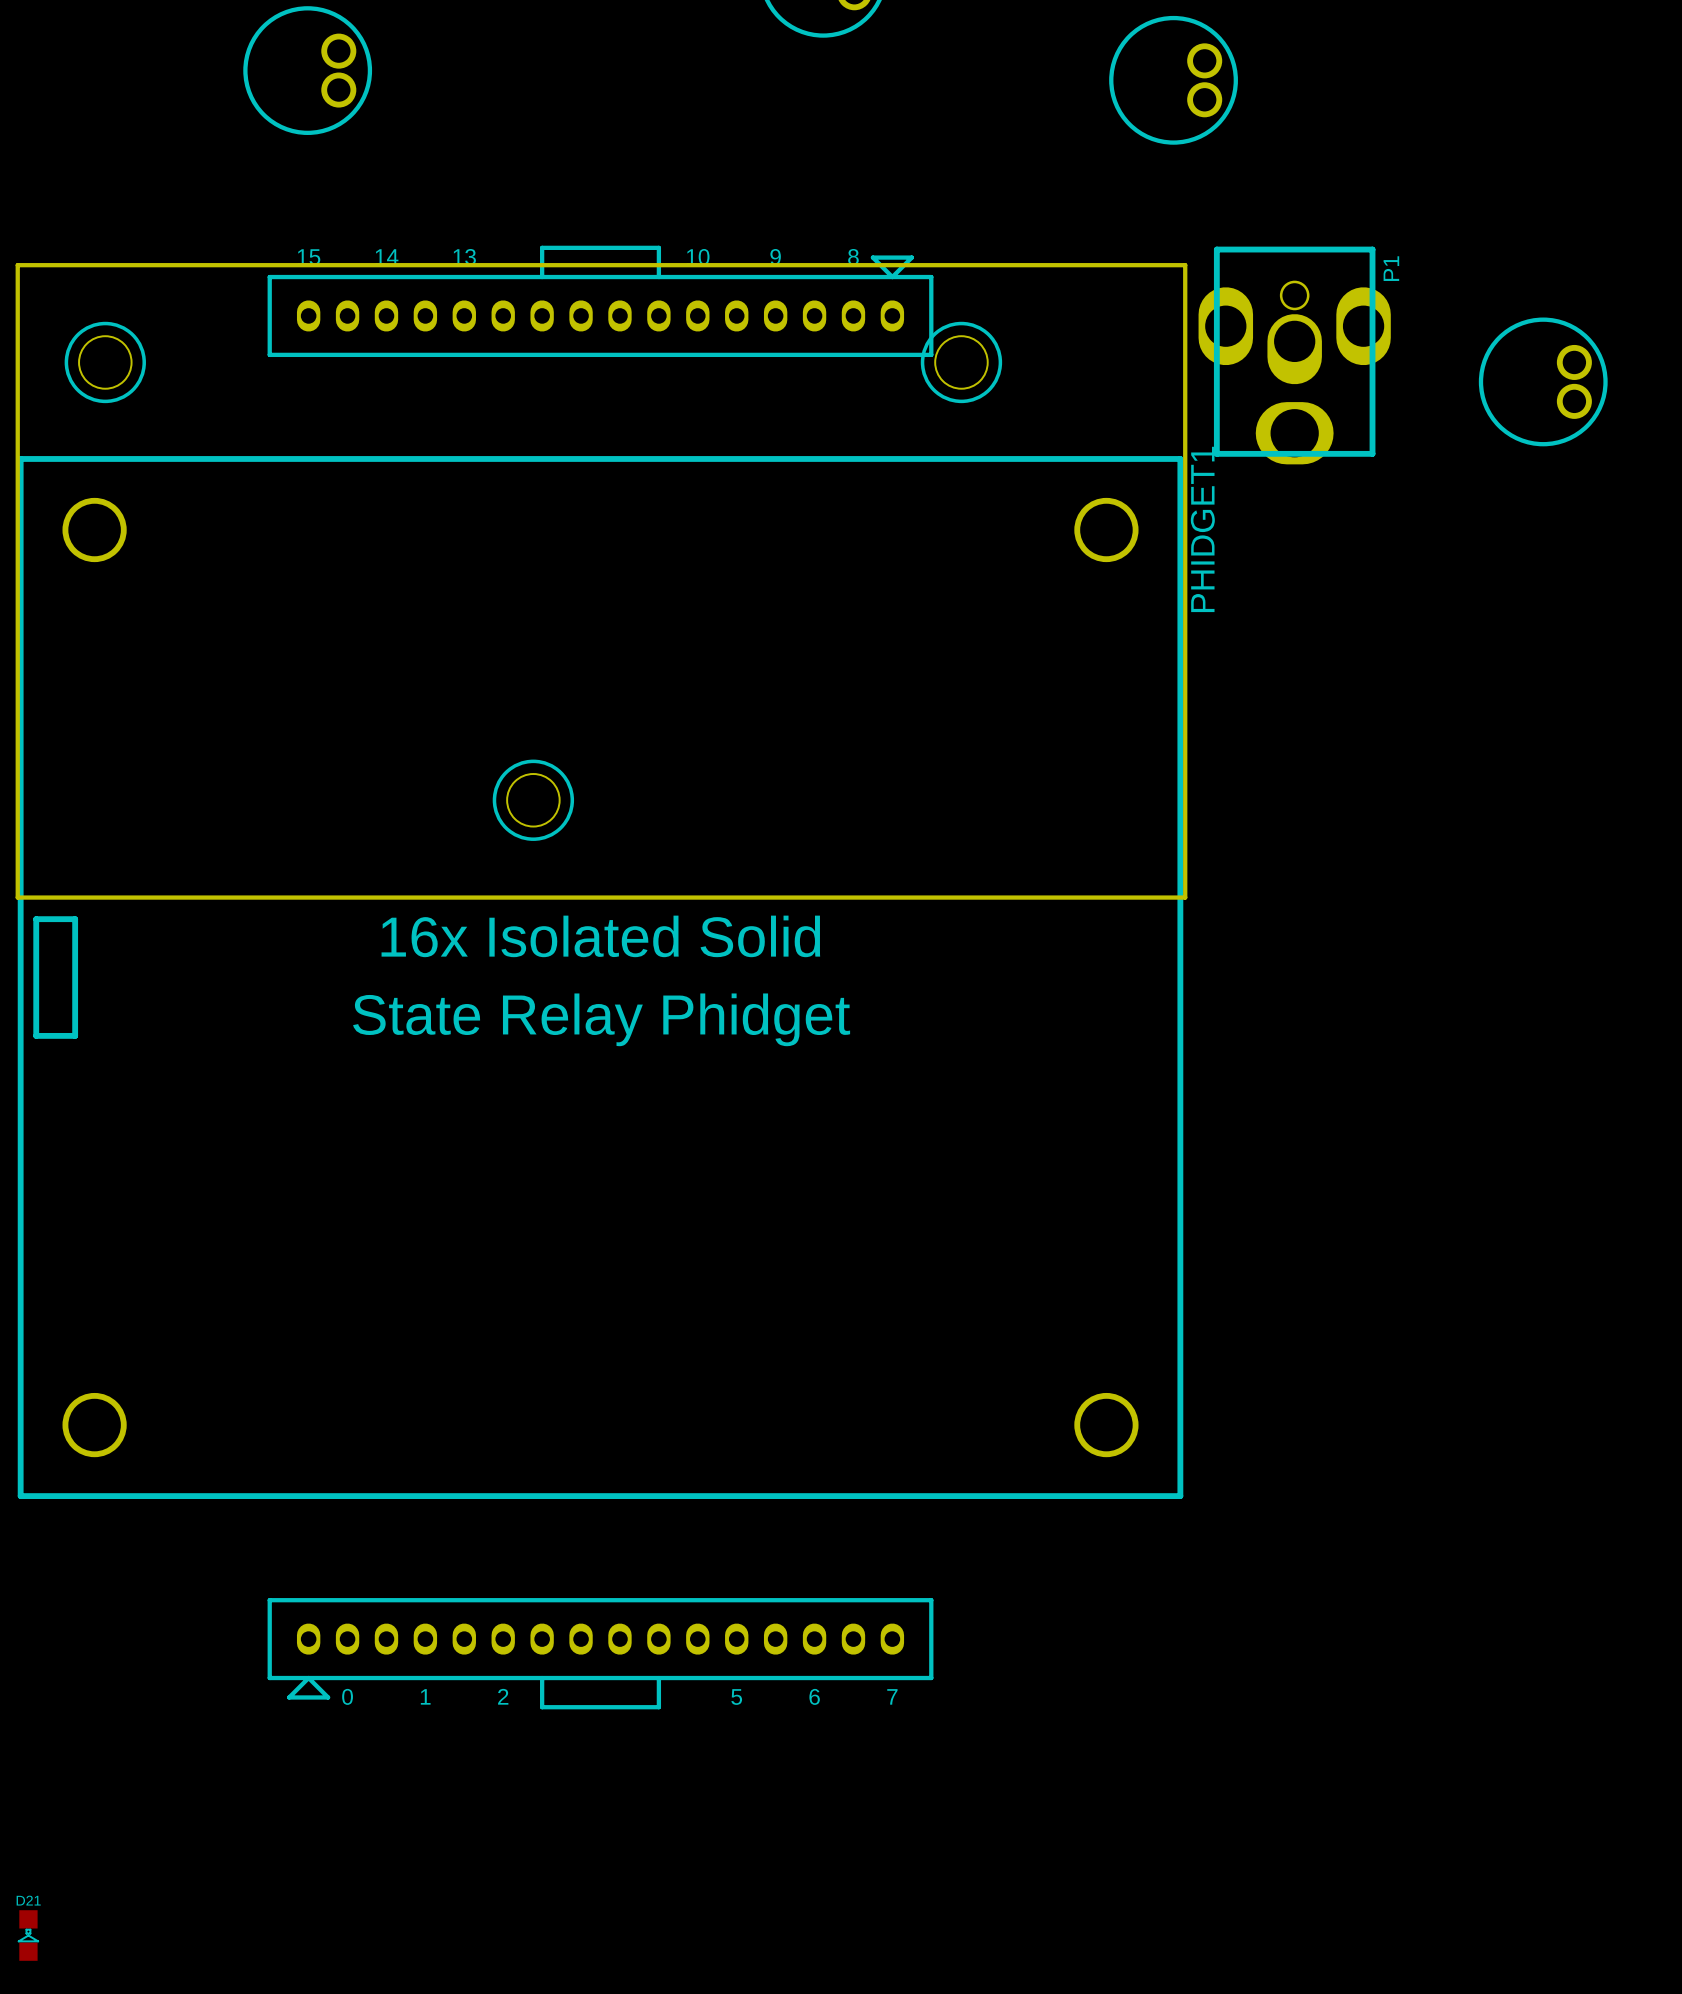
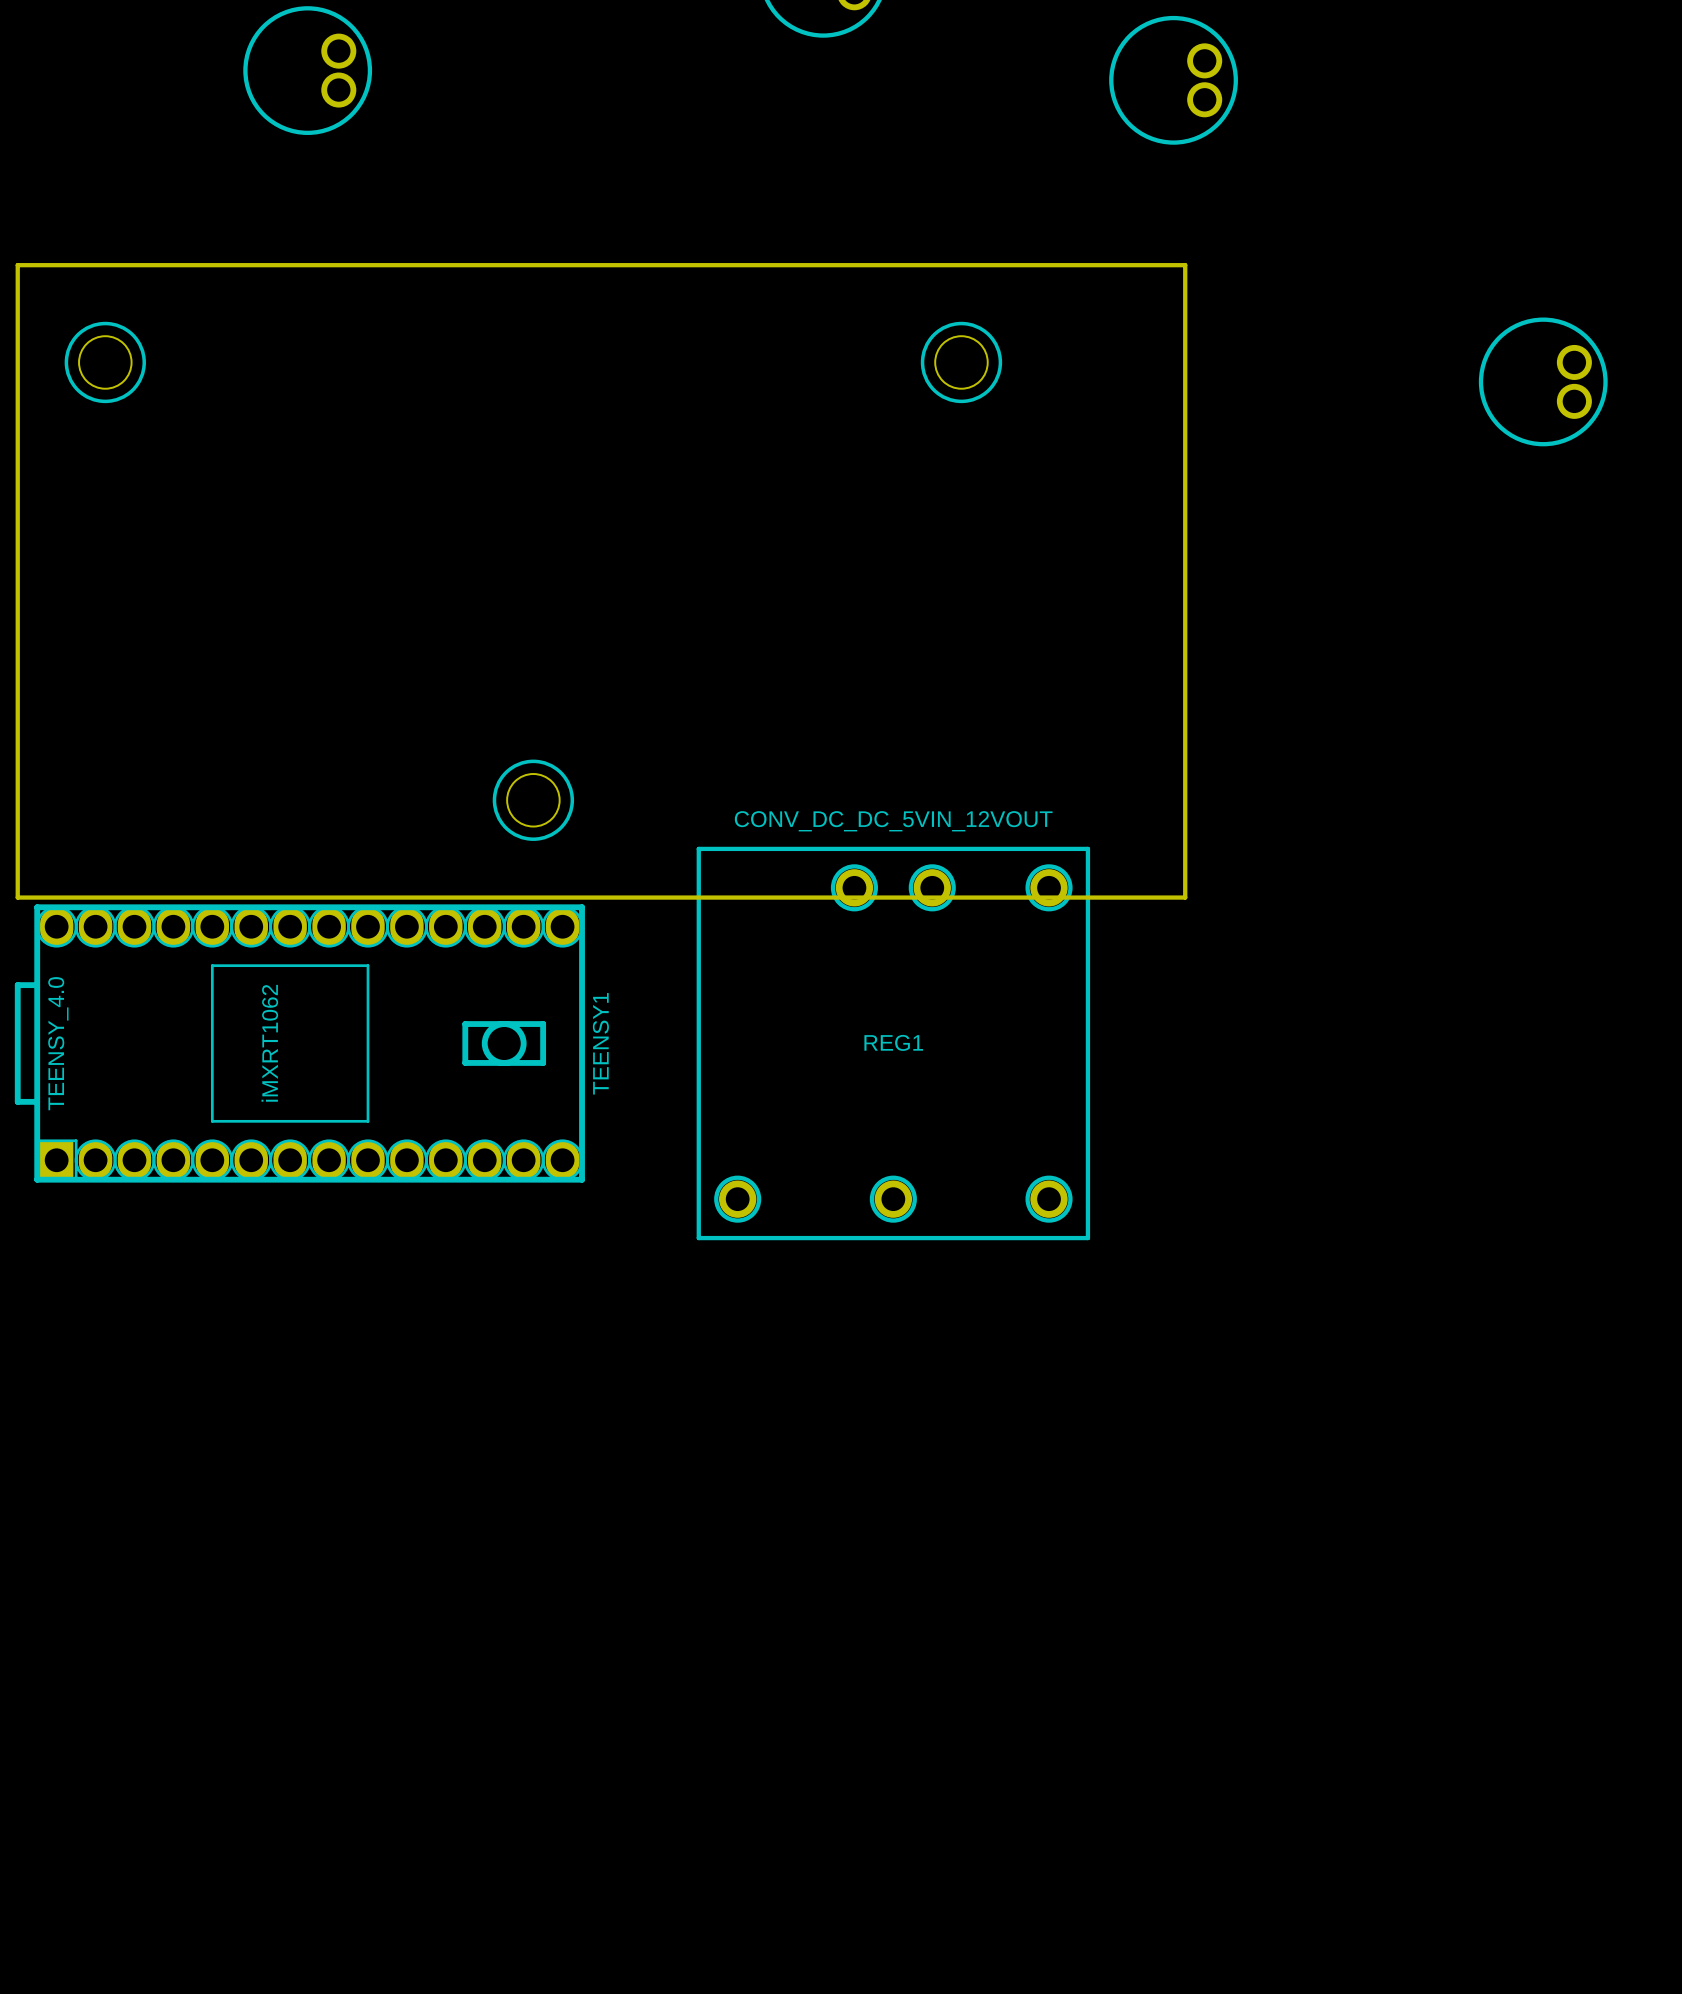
P1: (1294, 355) -> none
PHIDGET1: (600, 977) -> none
TEENSY1: none -> TEENSY_4.0 (299, 1043)
REG1: none -> CONV_DC_DC_5VIN_12VOUT (893, 1043)
D21: (28, 1935) -> none

